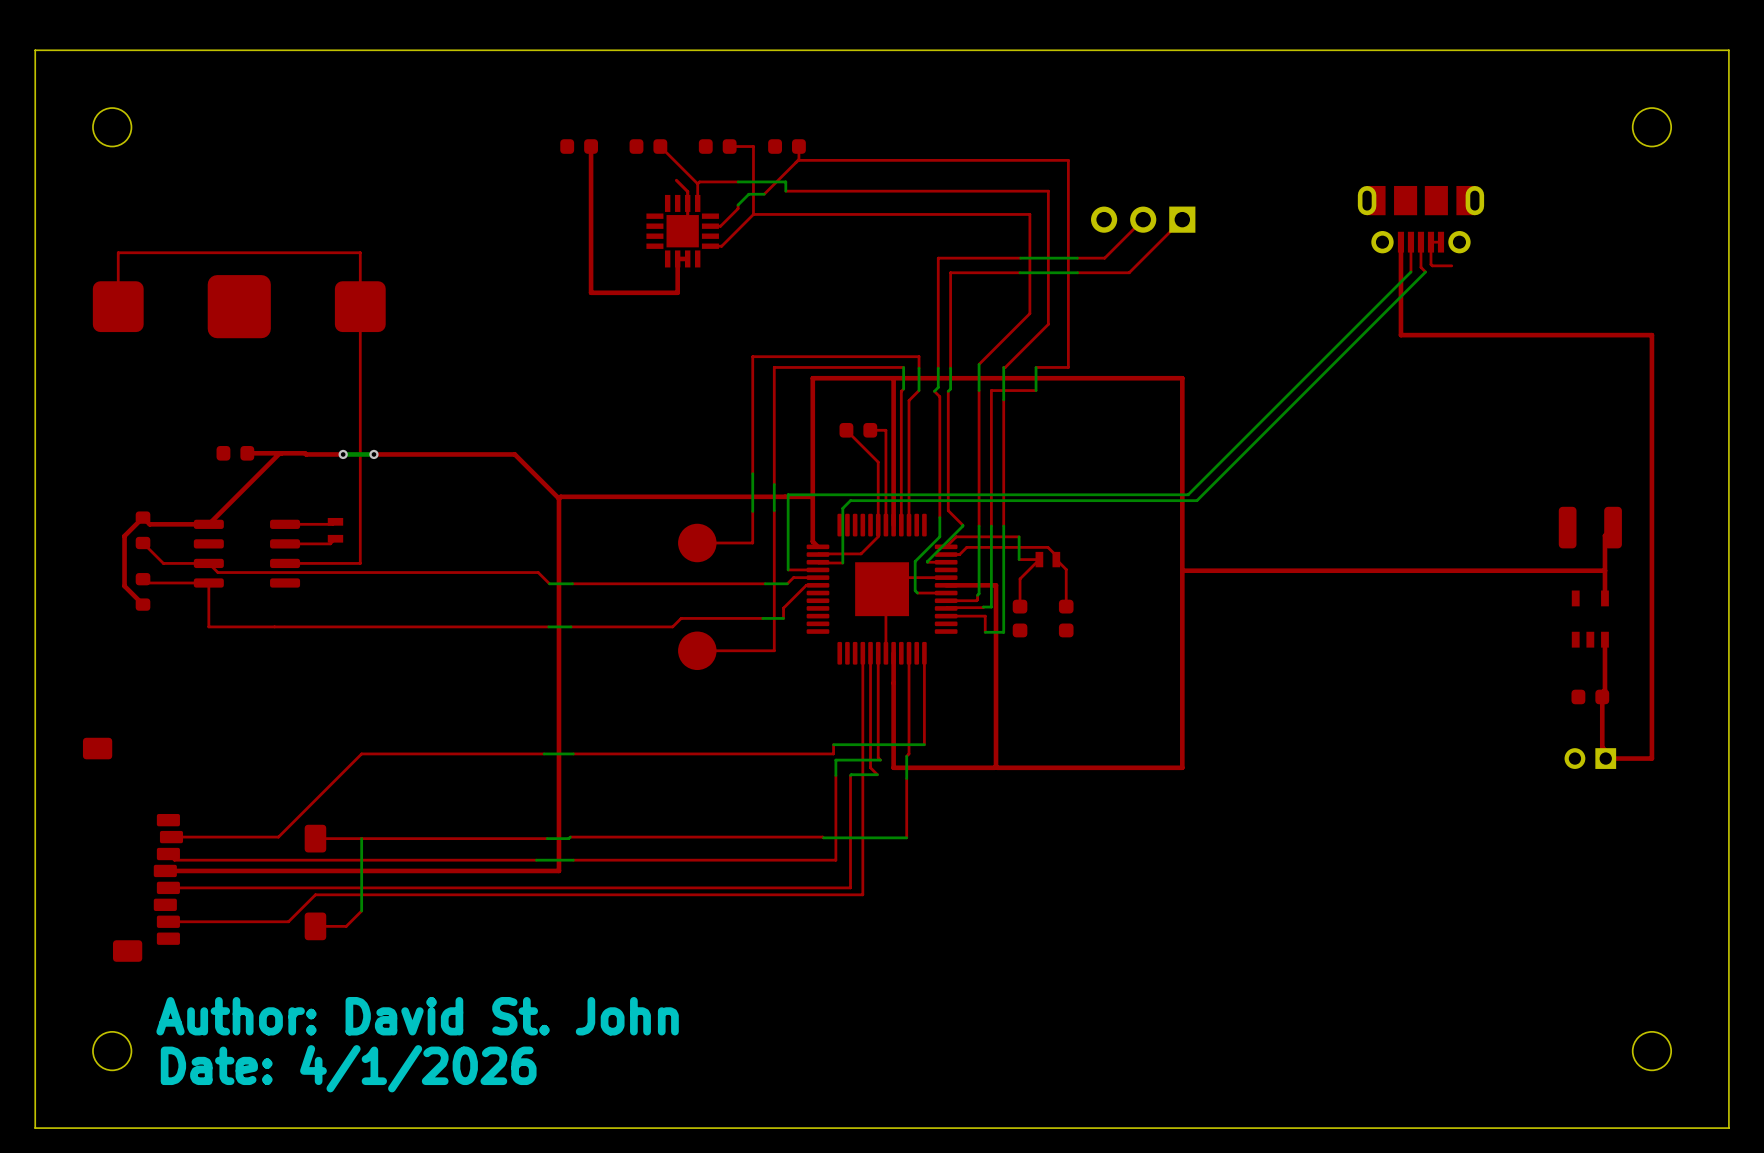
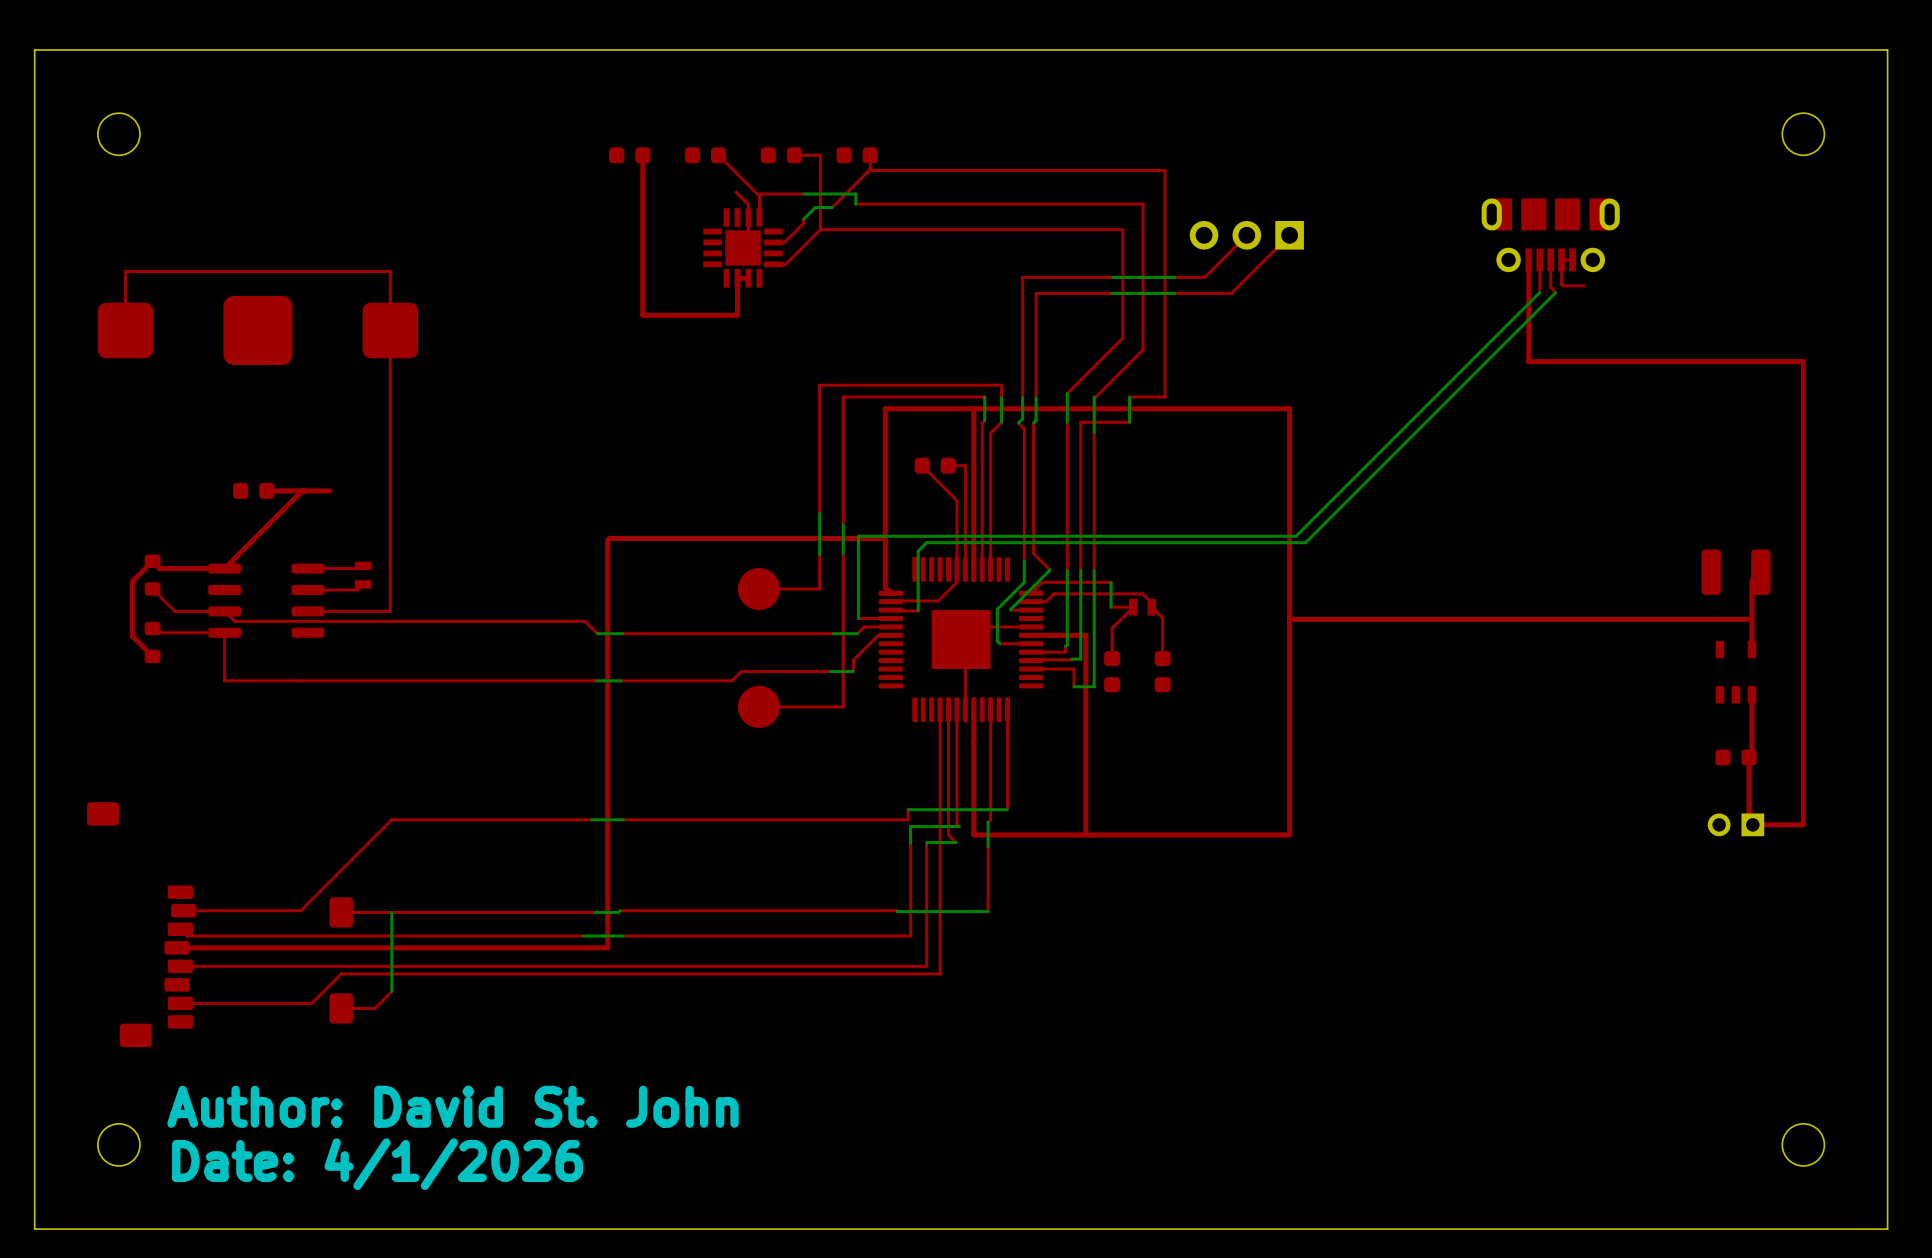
top track: (305, 453) (343, 454) -> none
via: (343, 454) -> none
top track: (373, 454) (514, 454) (558, 498) -> none
bottom track: (373, 454) (343, 454) -> none
via: (373, 454) -> none

